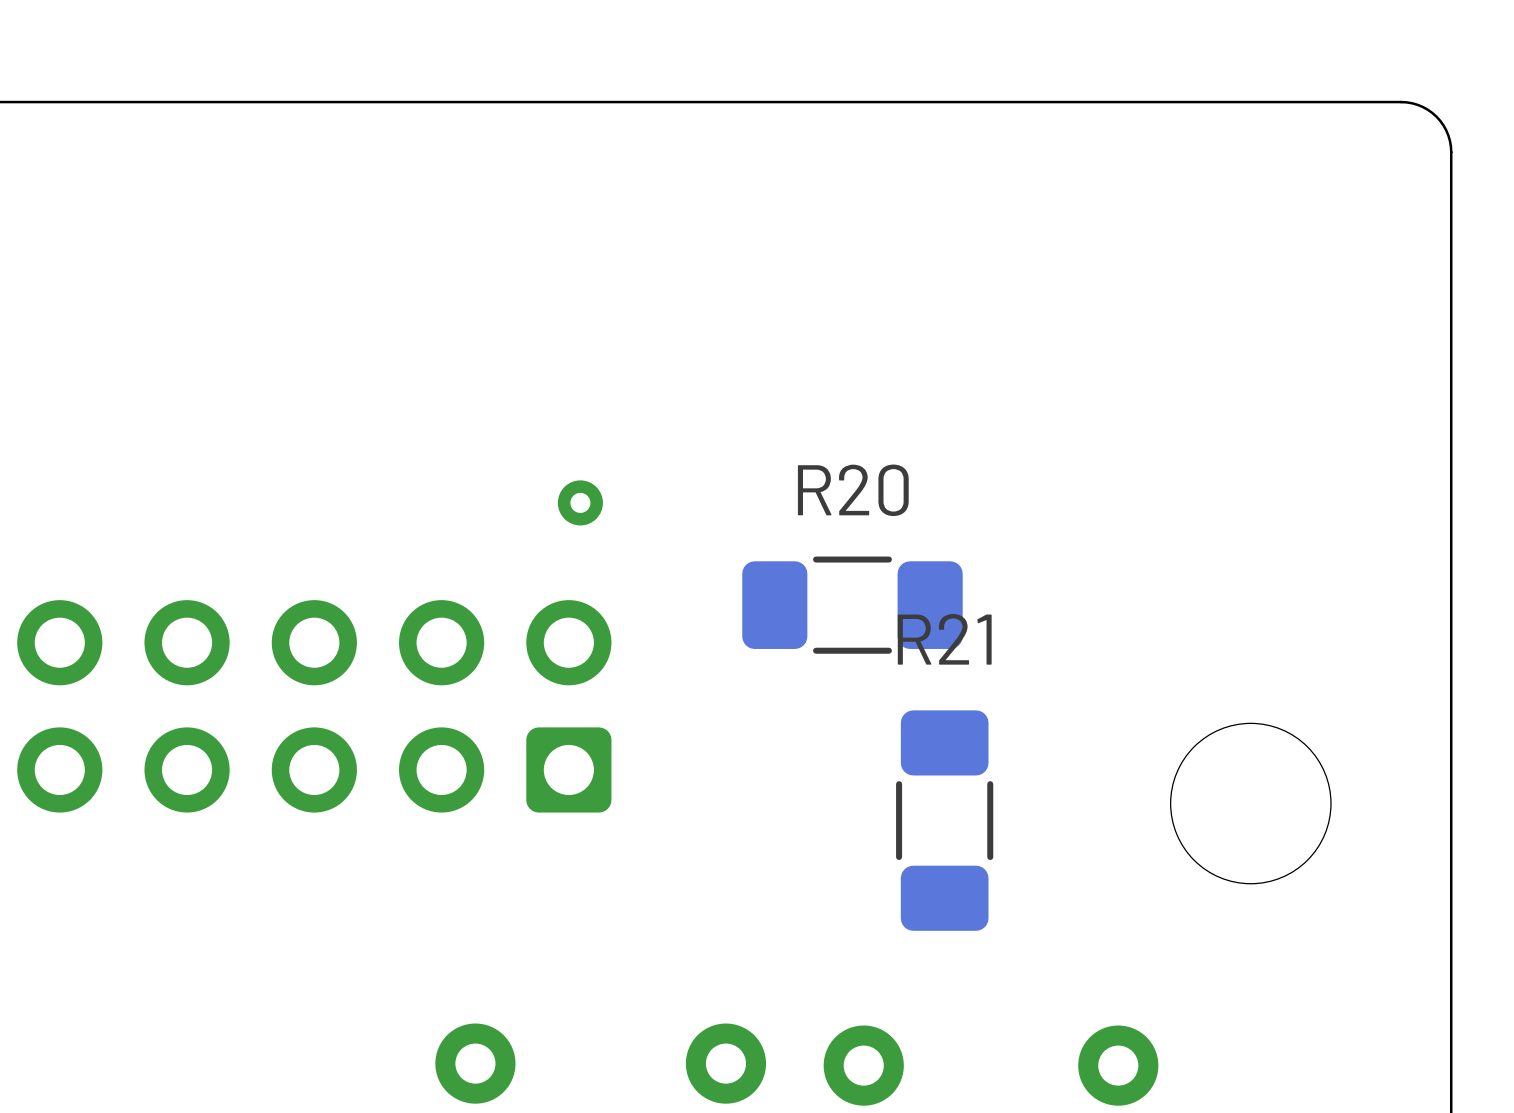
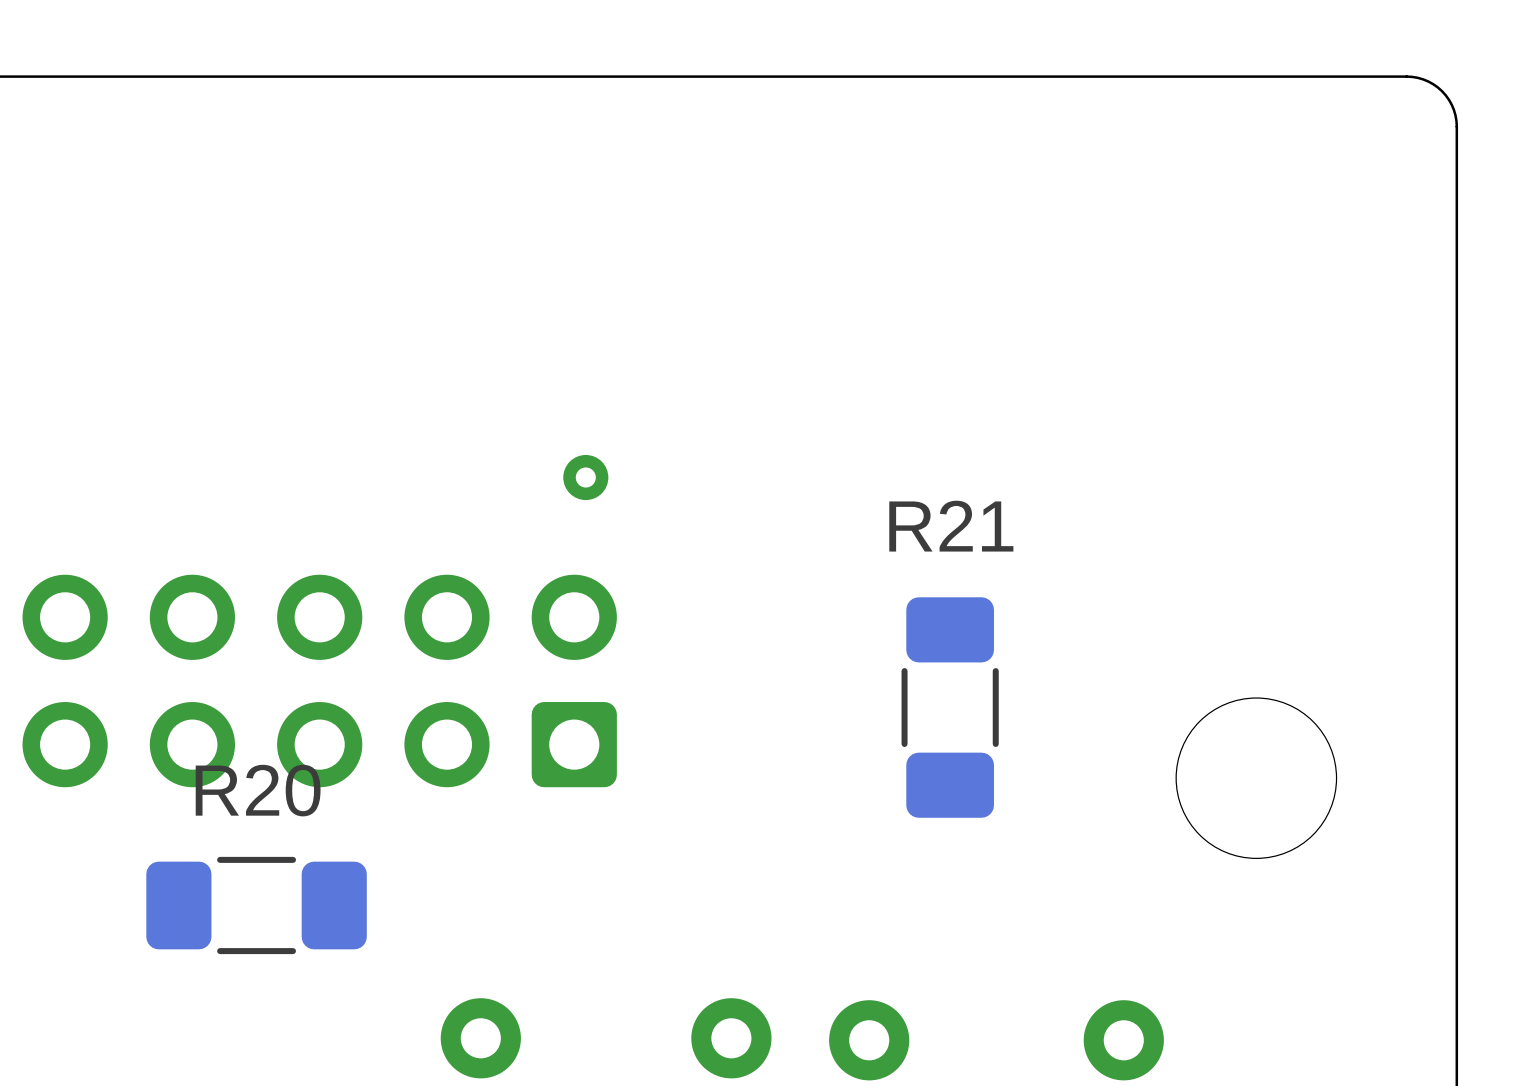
R20 position: (852, 605) -> (256, 905)
R21 position: (944, 820) -> (950, 707)

